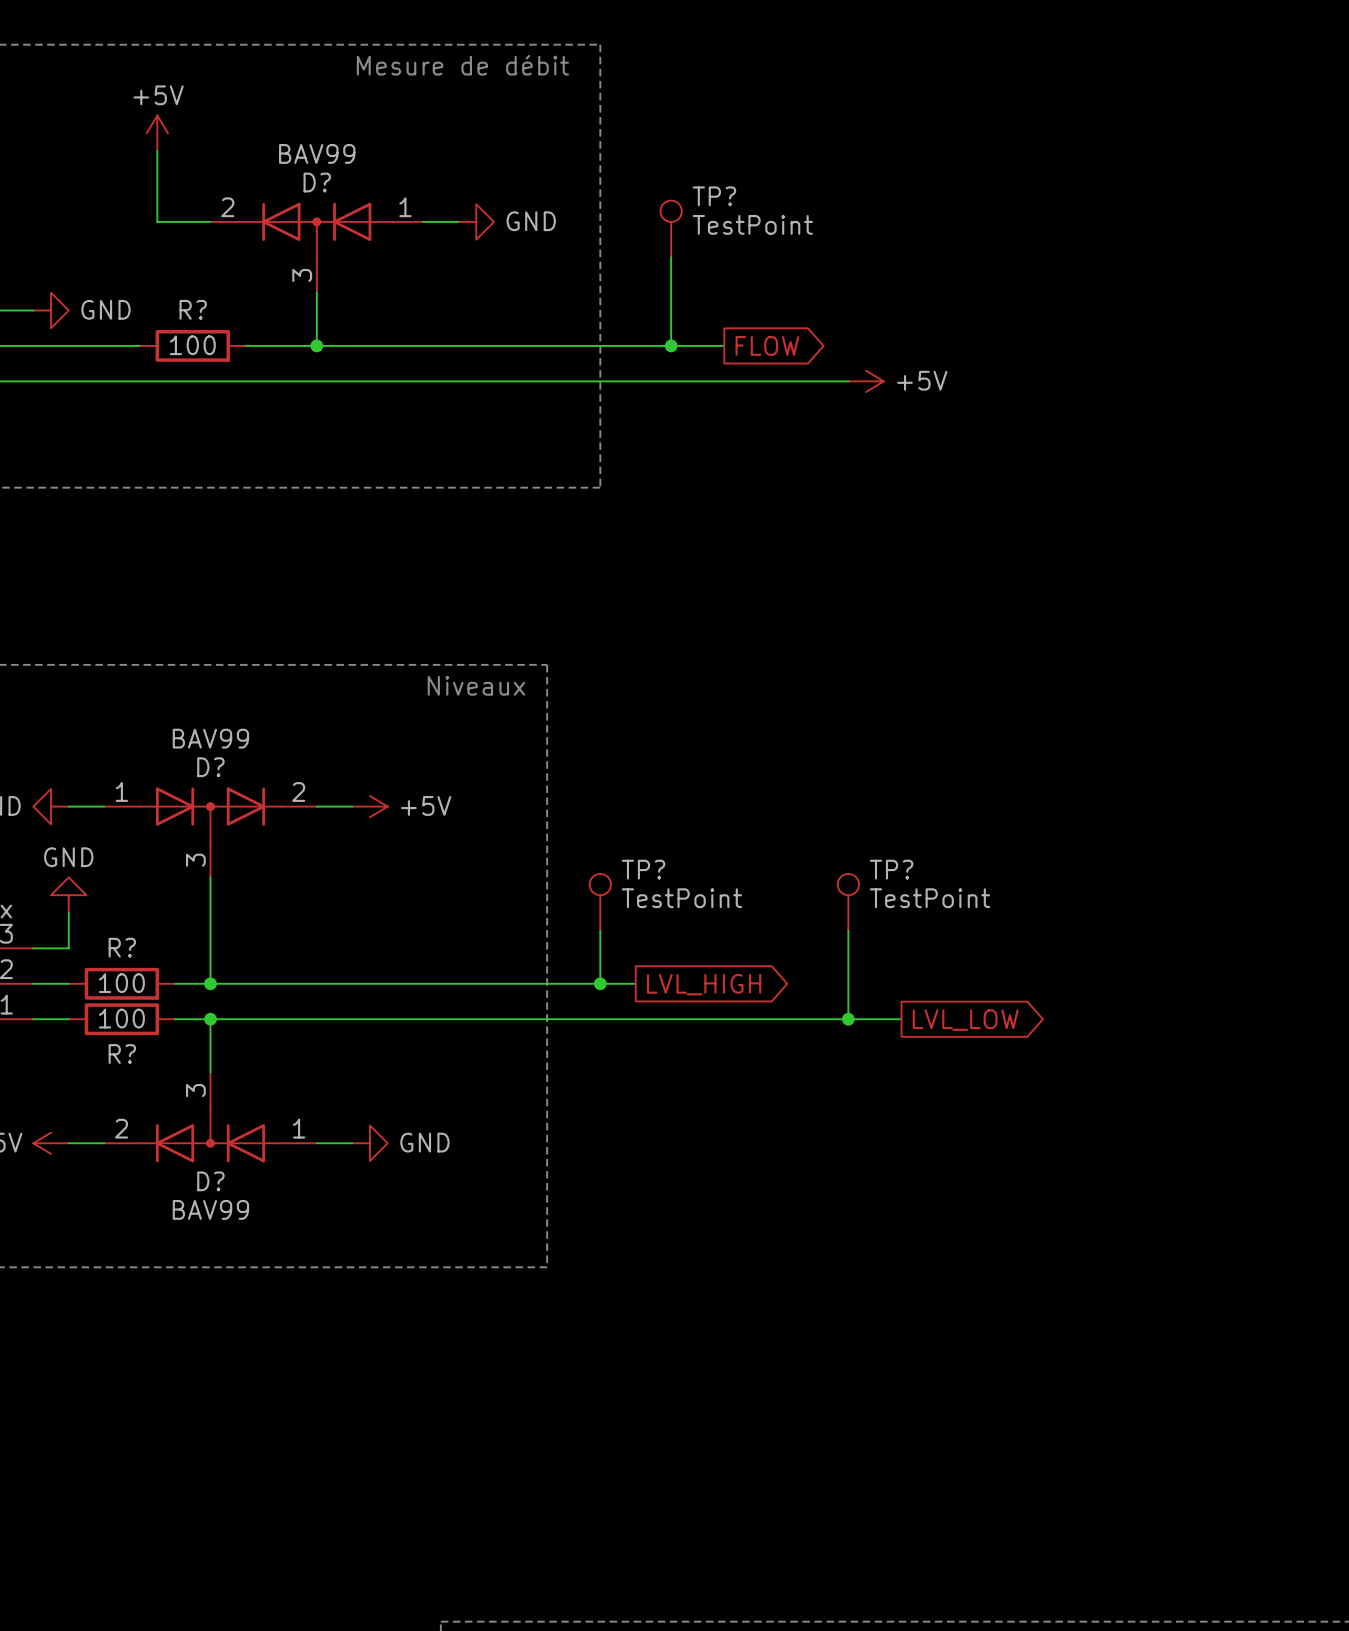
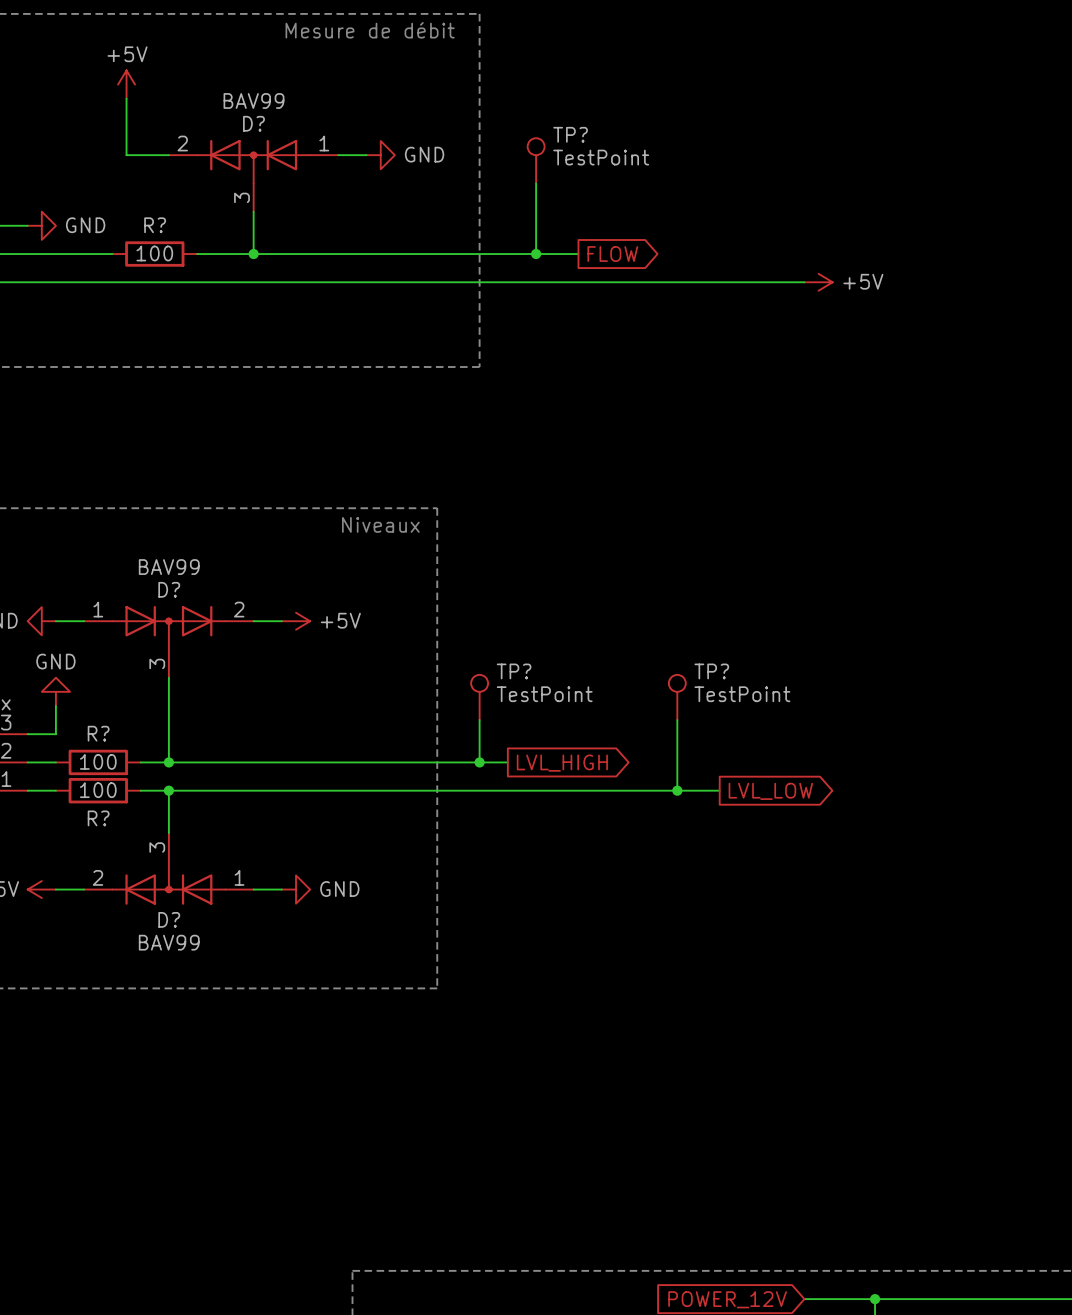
wire: none -> (677, 282) (804, 282)
power symbol position: +5V (866, 381) -> +5V (818, 282)

